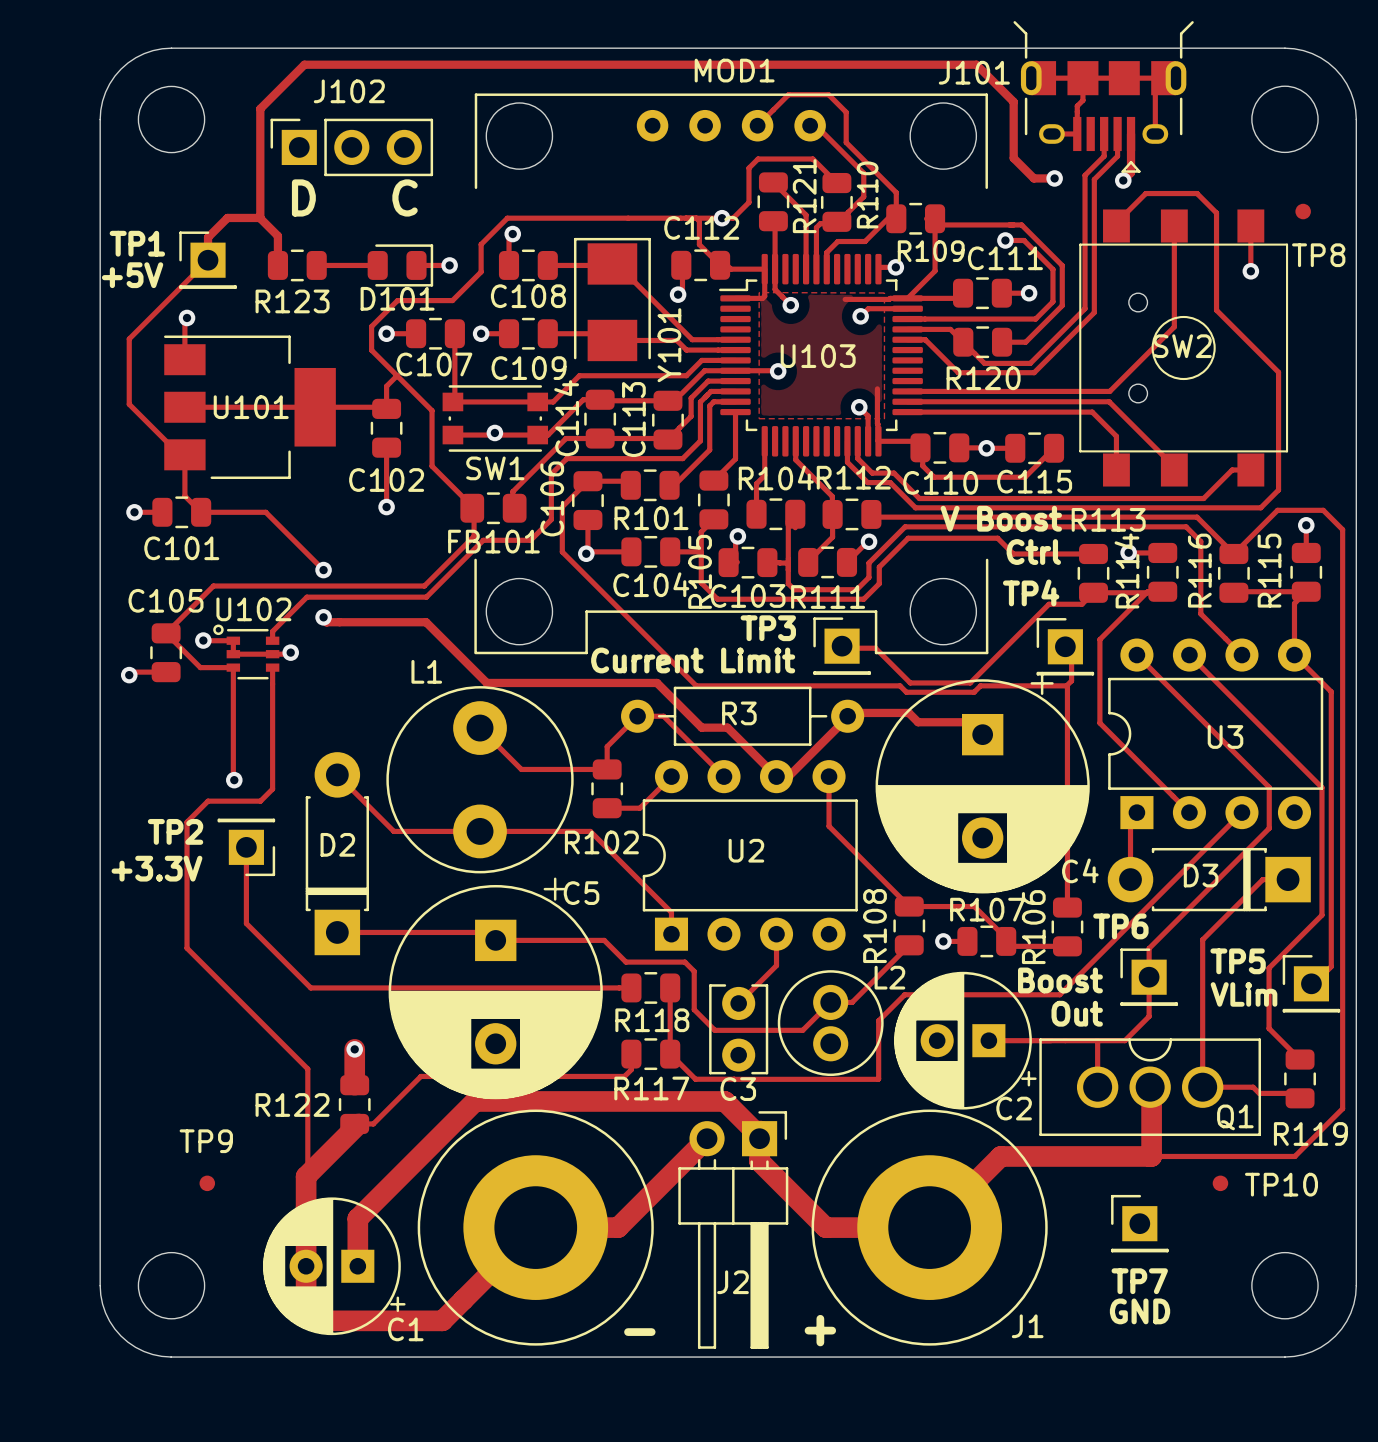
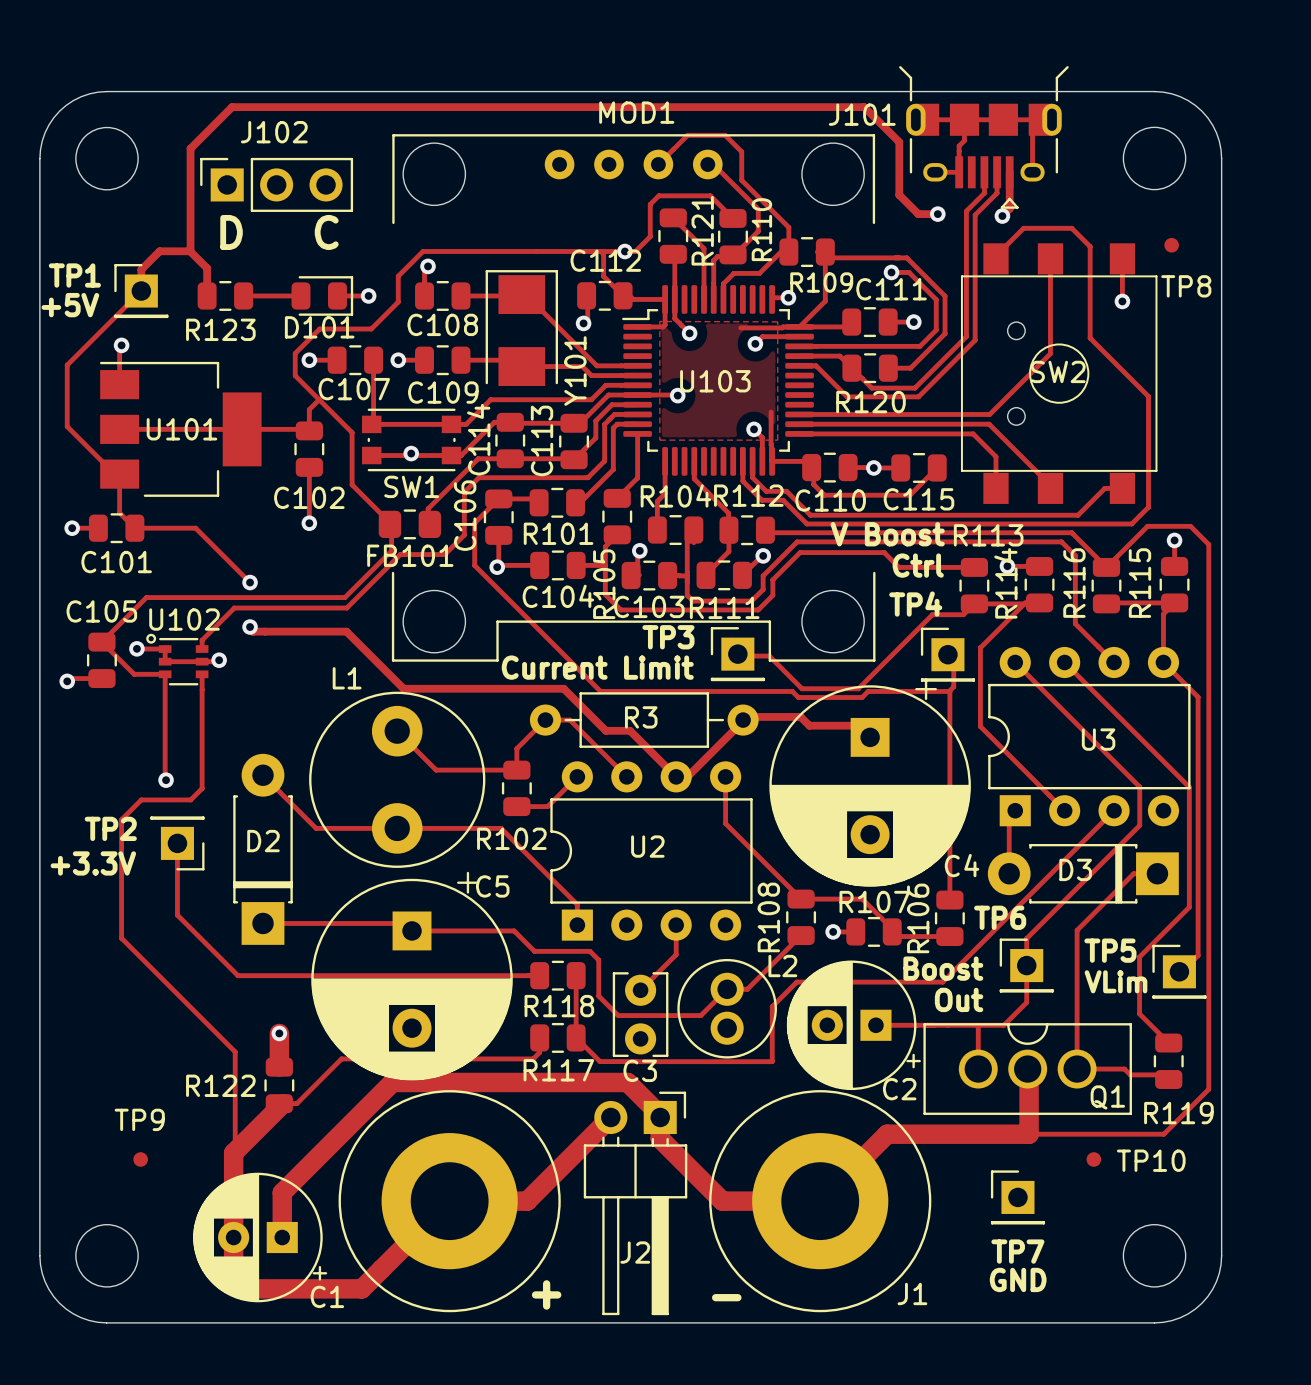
text: + (820, 1330) -> - (726, 1297)
text: - (639, 1332) -> + (546, 1294)

